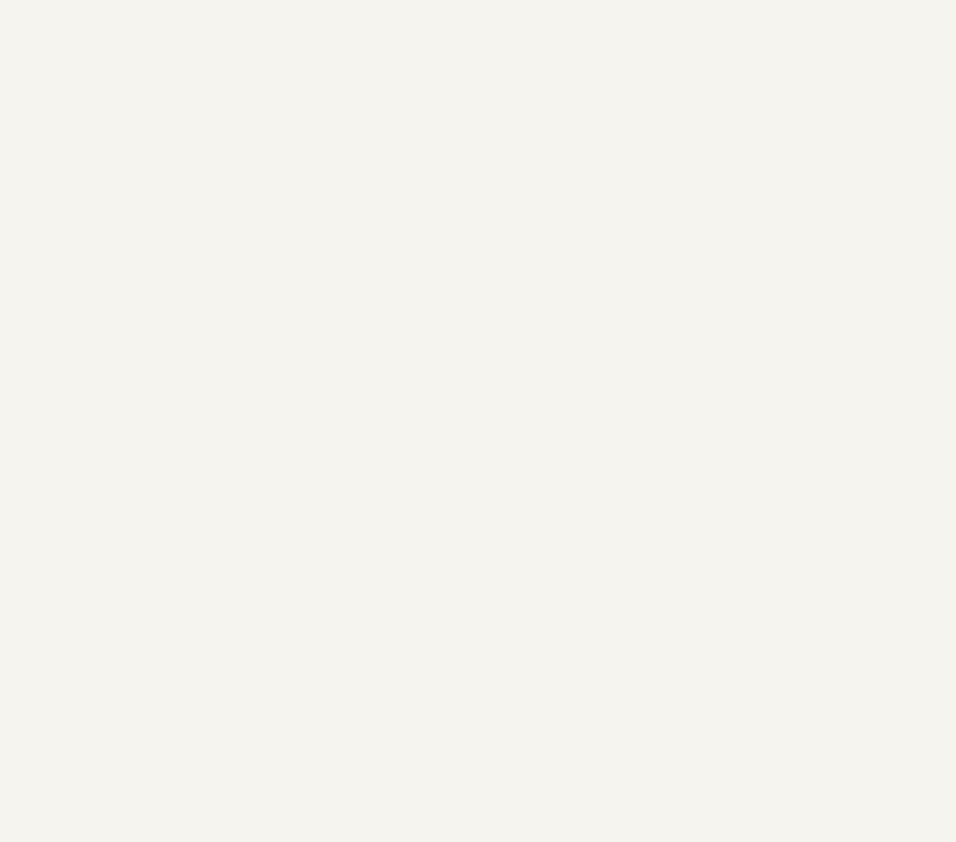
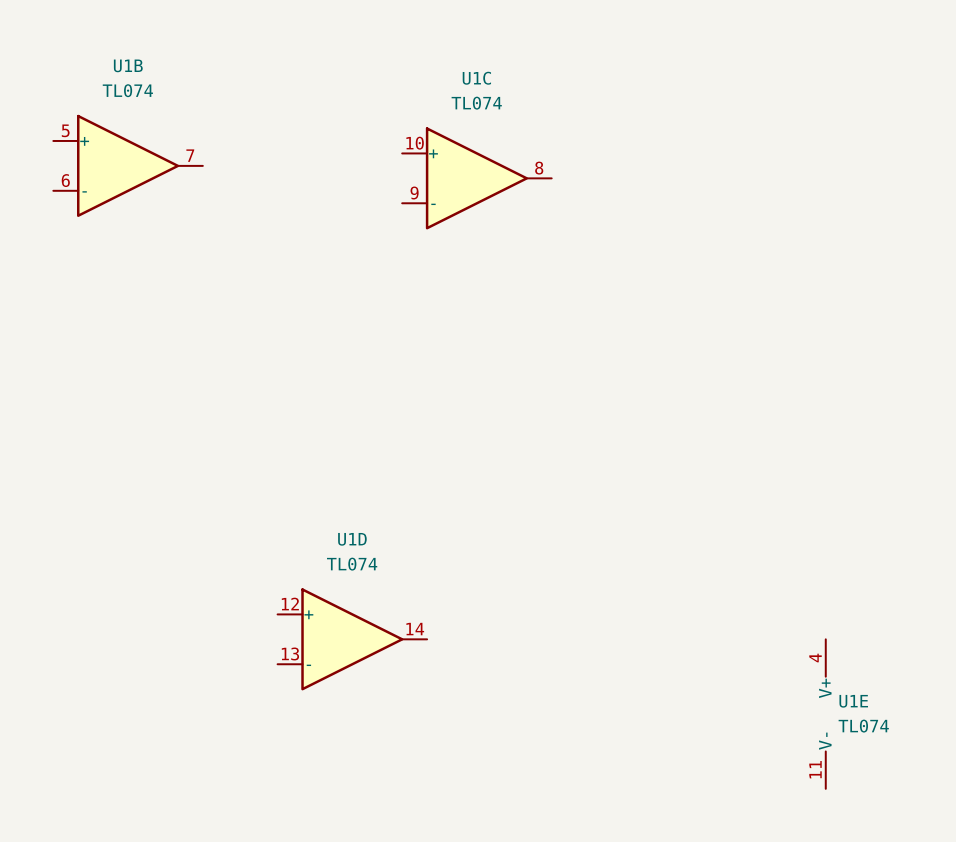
U1B: none -> TL074 (128, 165)
U1C: none -> TL074 (476, 178)
U1D: none -> TL074 (352, 639)
U1E: none -> TL074 (825, 714)

